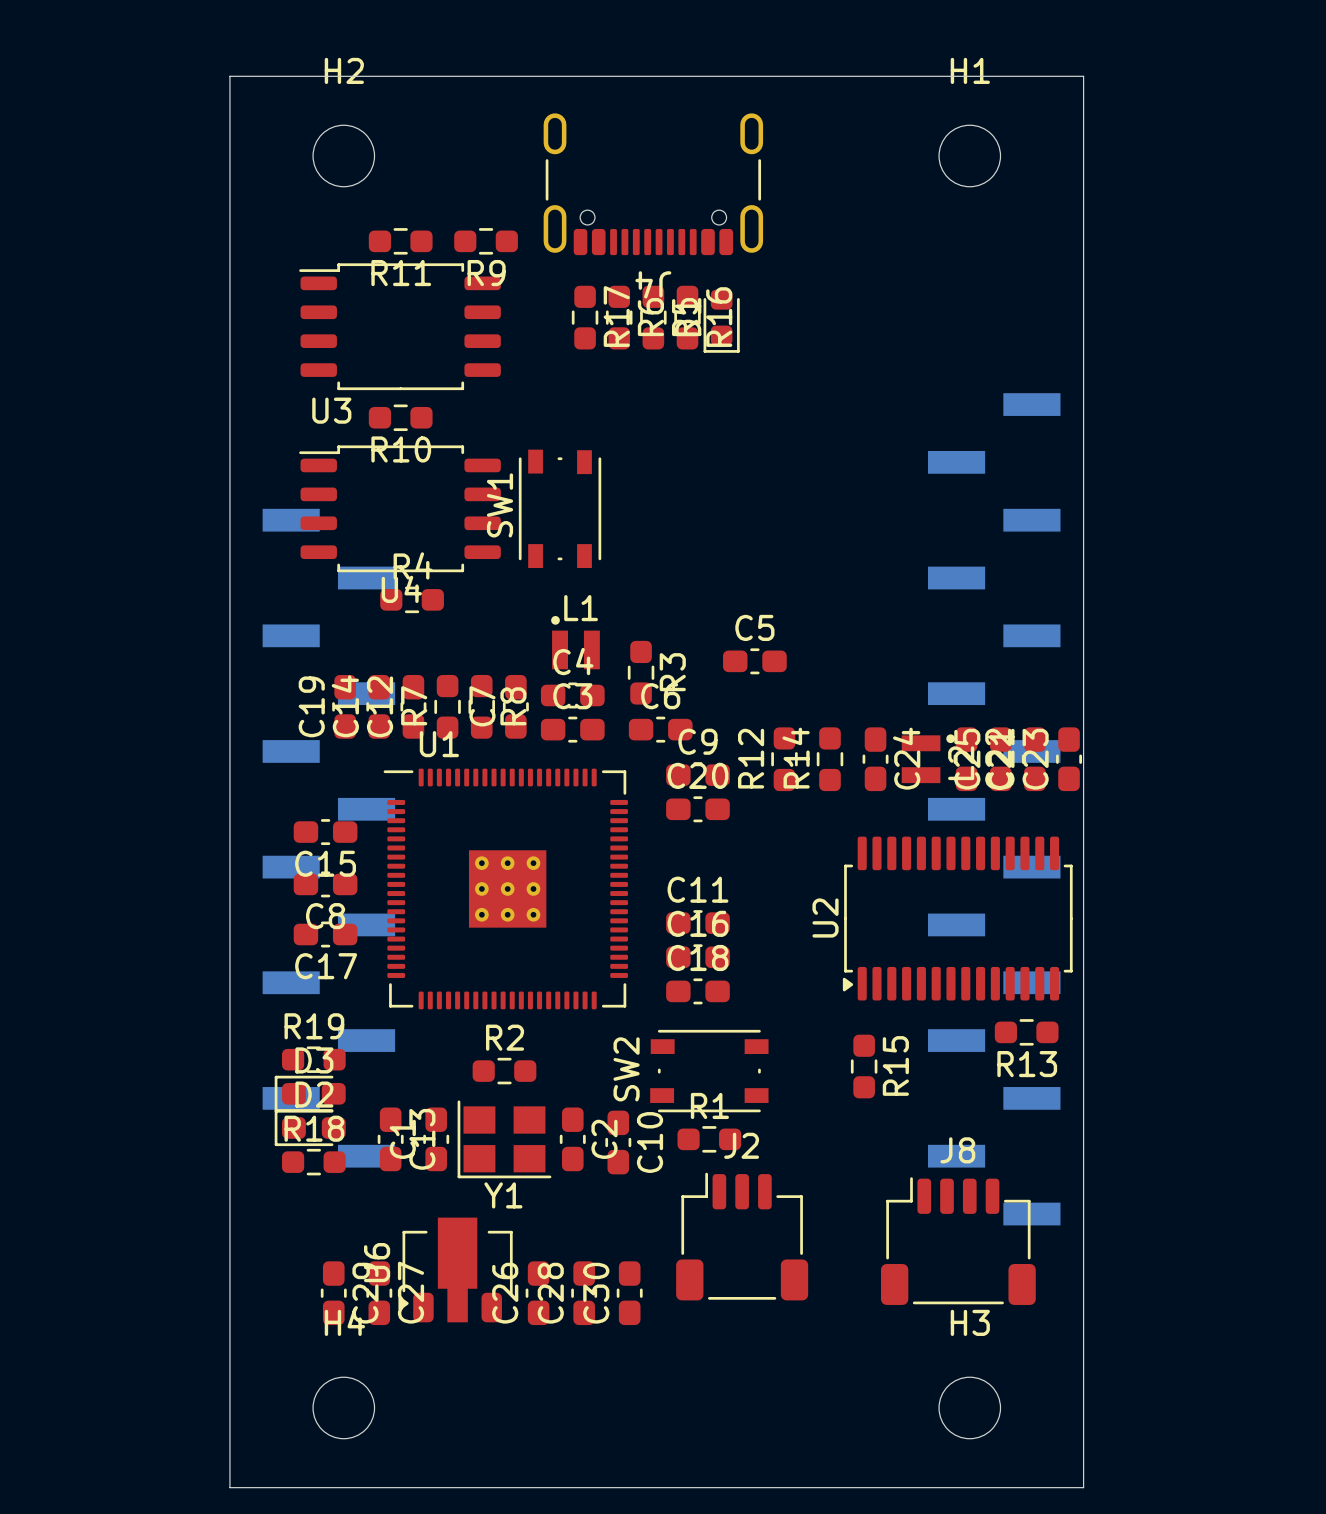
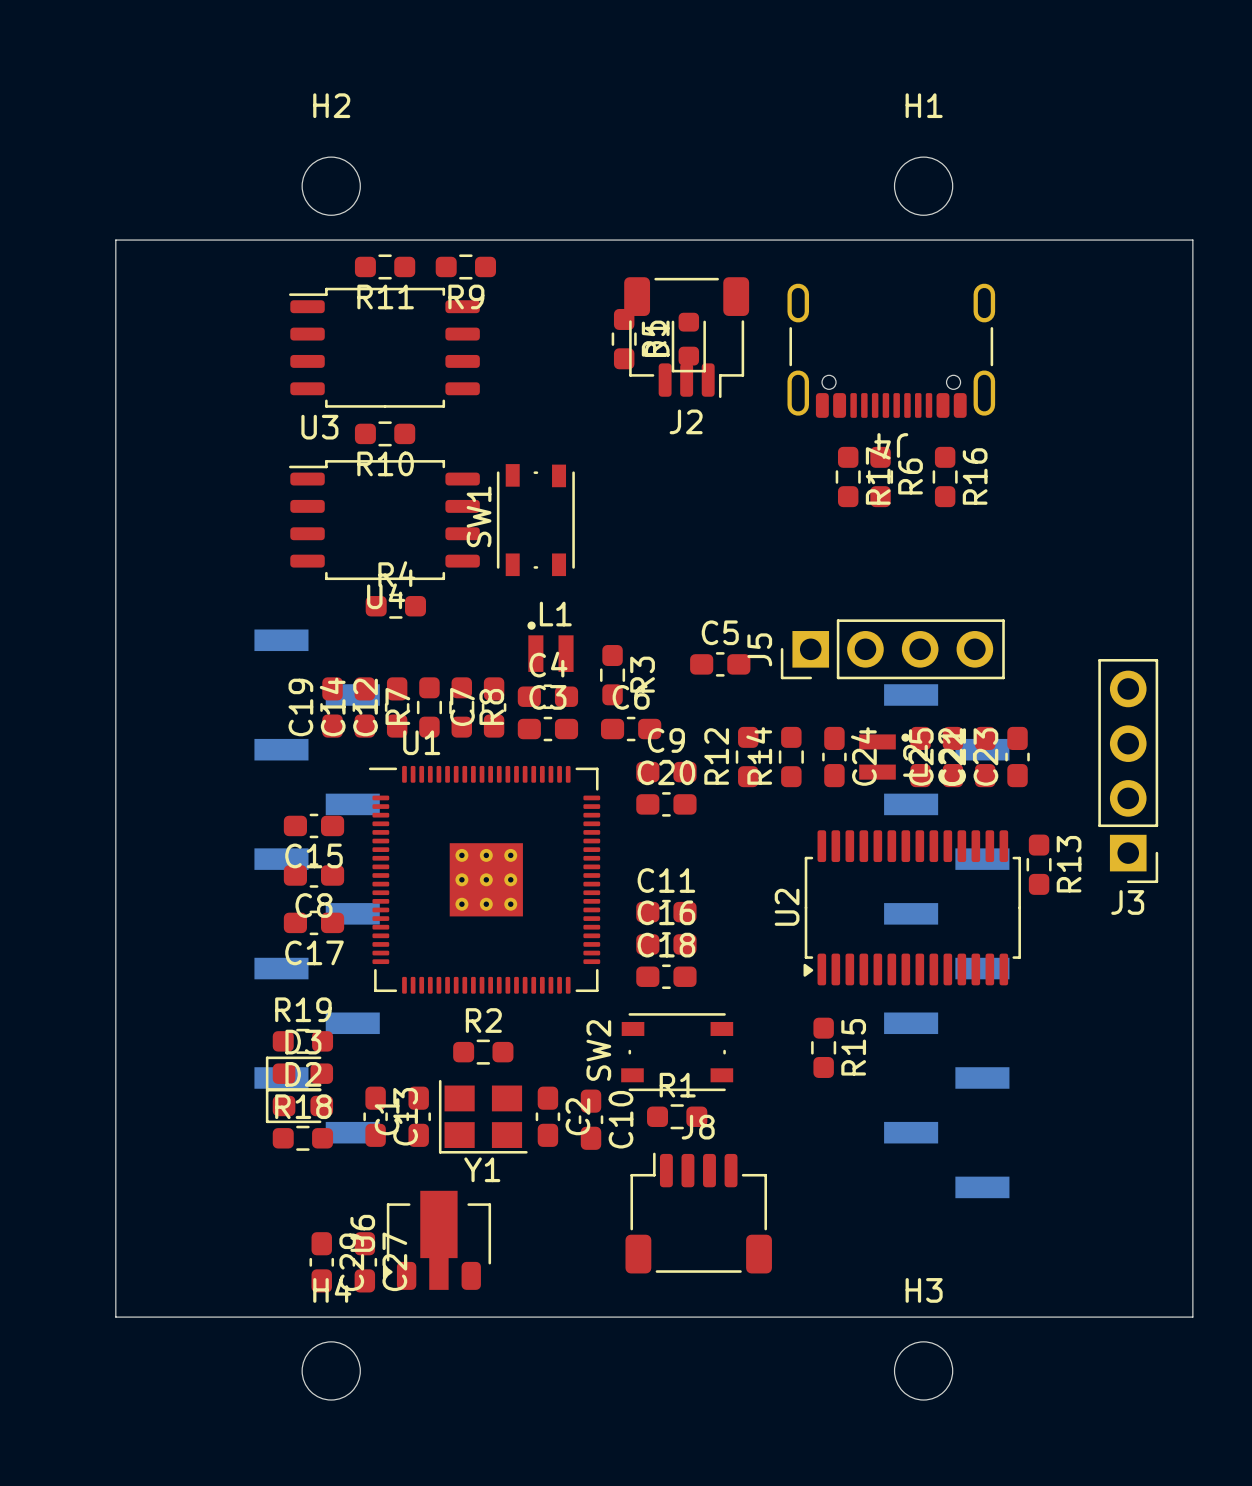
board edge: (229, 76) (1083, 76) (1083, 1487) (229, 1487) (229, 76) -> (115, 240) (115, 1317) (1192, 1317) (1192, 240) (115, 240)
J4 position: (653, 184) -> (891, 350)
R17 position: (585, 317) -> (848, 476)
R6 position: (619, 317) -> (880, 476)
R16 position: (687, 317) -> (945, 476)
part: (994, 520) -> none
part: (328, 549) -> none
J5: none -> (892, 649)
J3: none -> (1128, 771)
R13 rotation: 0° (1026, 1032) -> 90° clockwise (1039, 864)
R13 position: (1026, 1032) -> (1039, 864)
R13 name position: R13 (1027, 1064) -> R13 (1069, 864)
J2 rotation: 0° (742, 1236) -> 180° (686, 337)
J2 position: (742, 1236) -> (686, 337)
J8 position: (958, 1241) -> (698, 1213)
C26: (538, 1293) -> none
C28: (584, 1293) -> none
C30: (629, 1293) -> none

